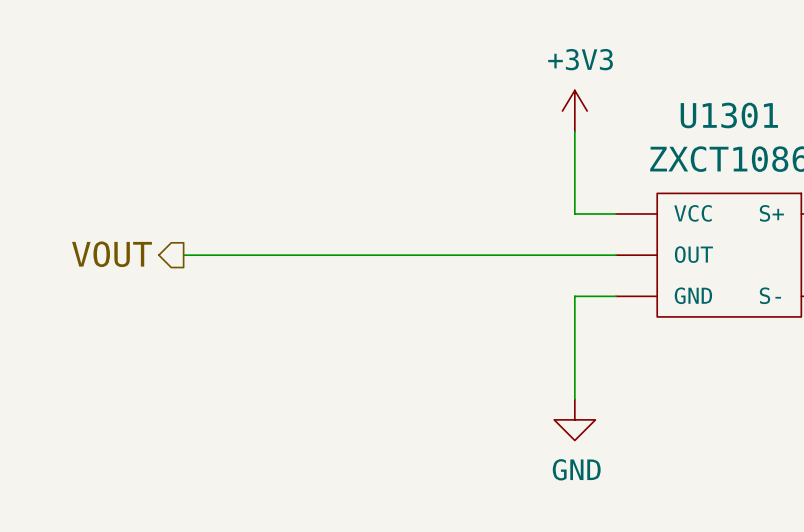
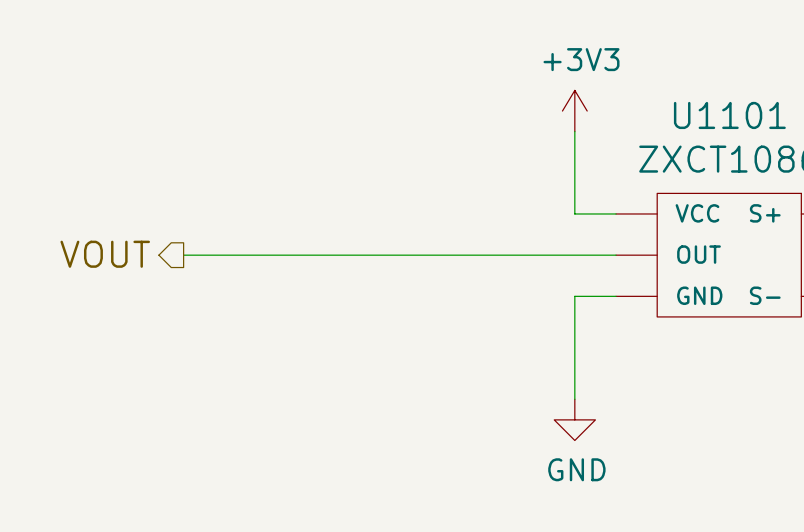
U1301 name: U1301 (729, 115) -> U1101 (729, 115)

